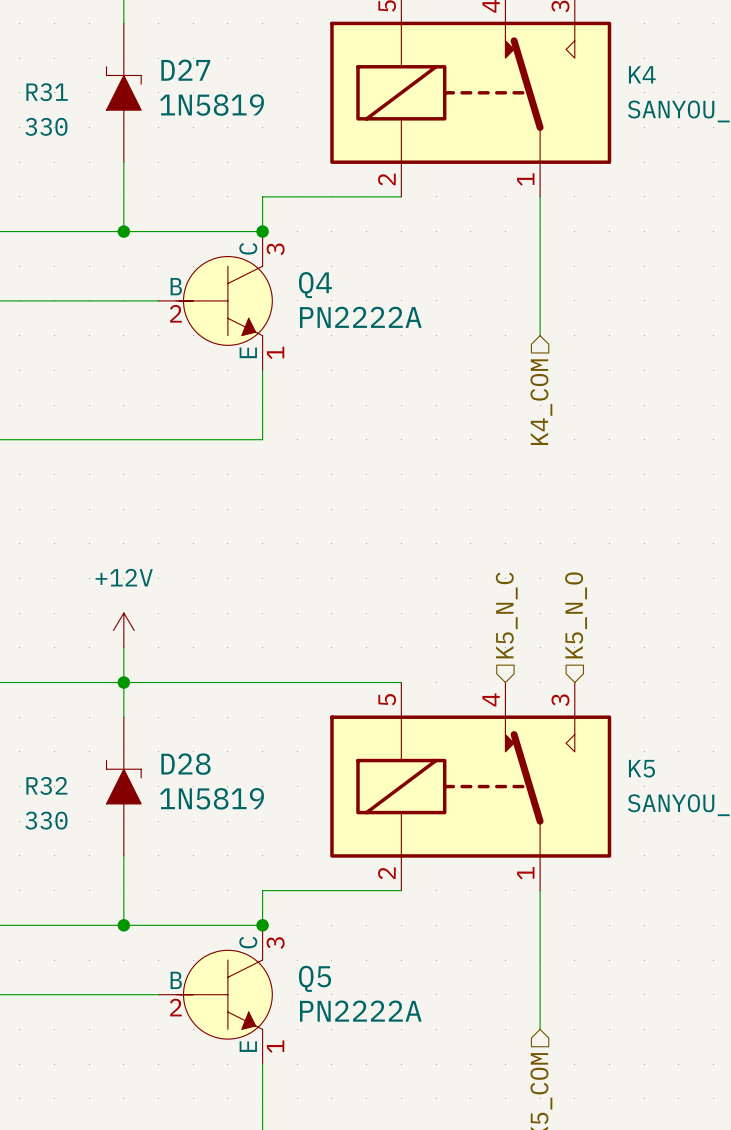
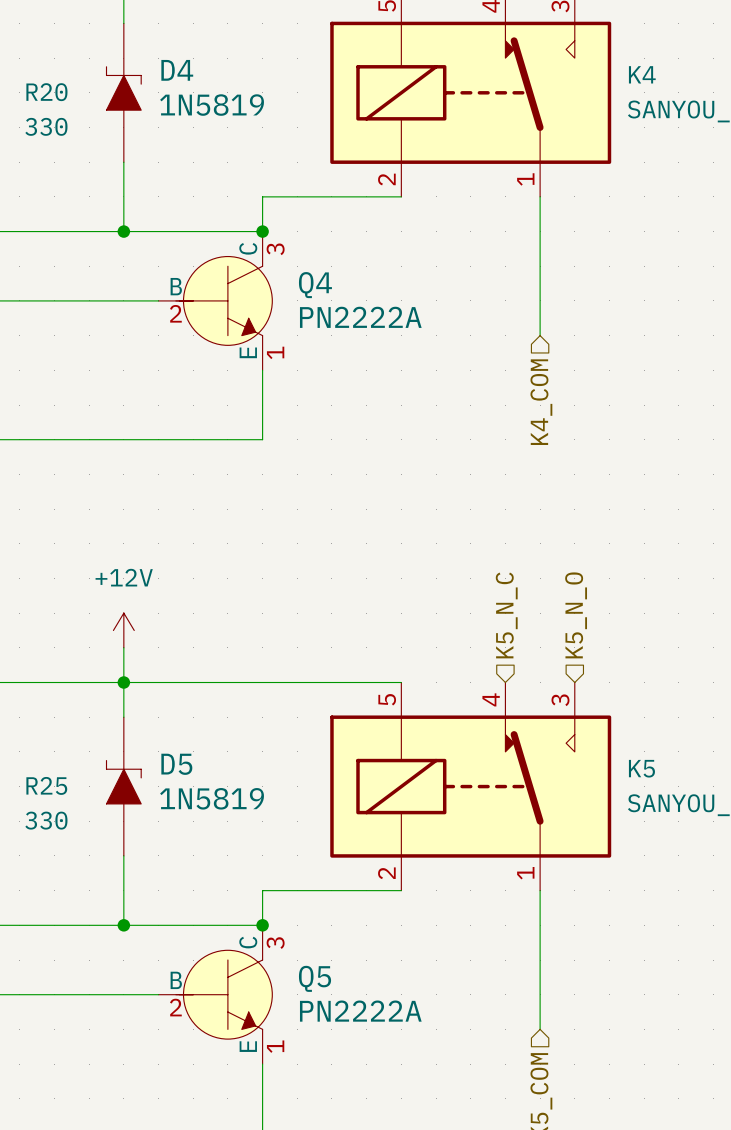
D27 name: D27 (185, 70) -> D4 (177, 70)
R31 name: R31 (47, 92) -> R20 (46, 92)
D28 name: D28 (185, 764) -> D5 (176, 764)
R32 name: R32 (46, 785) -> R25 (46, 785)

